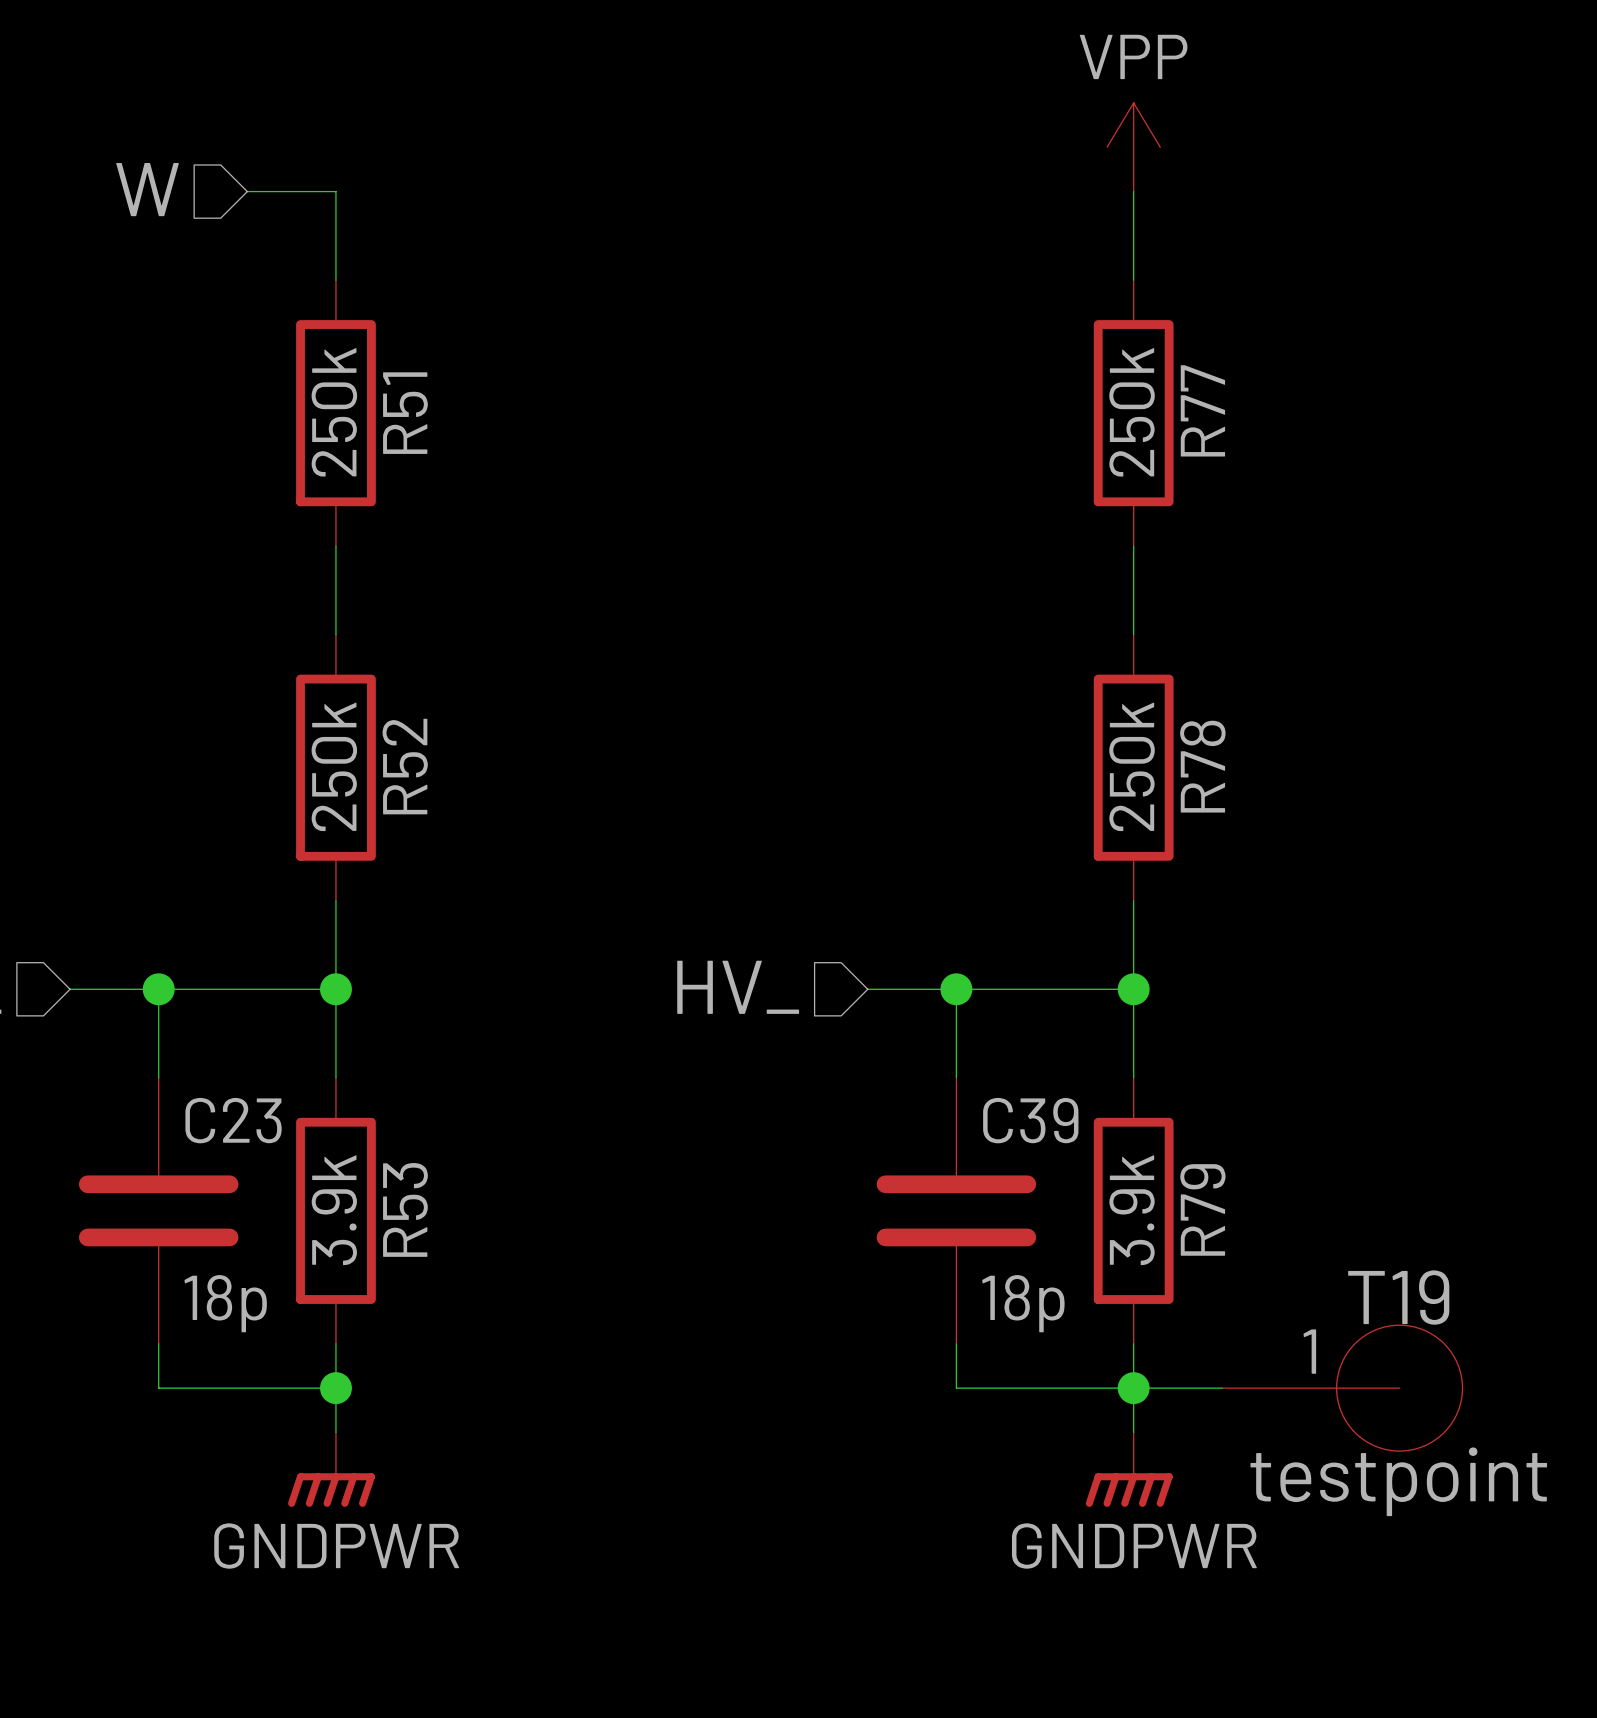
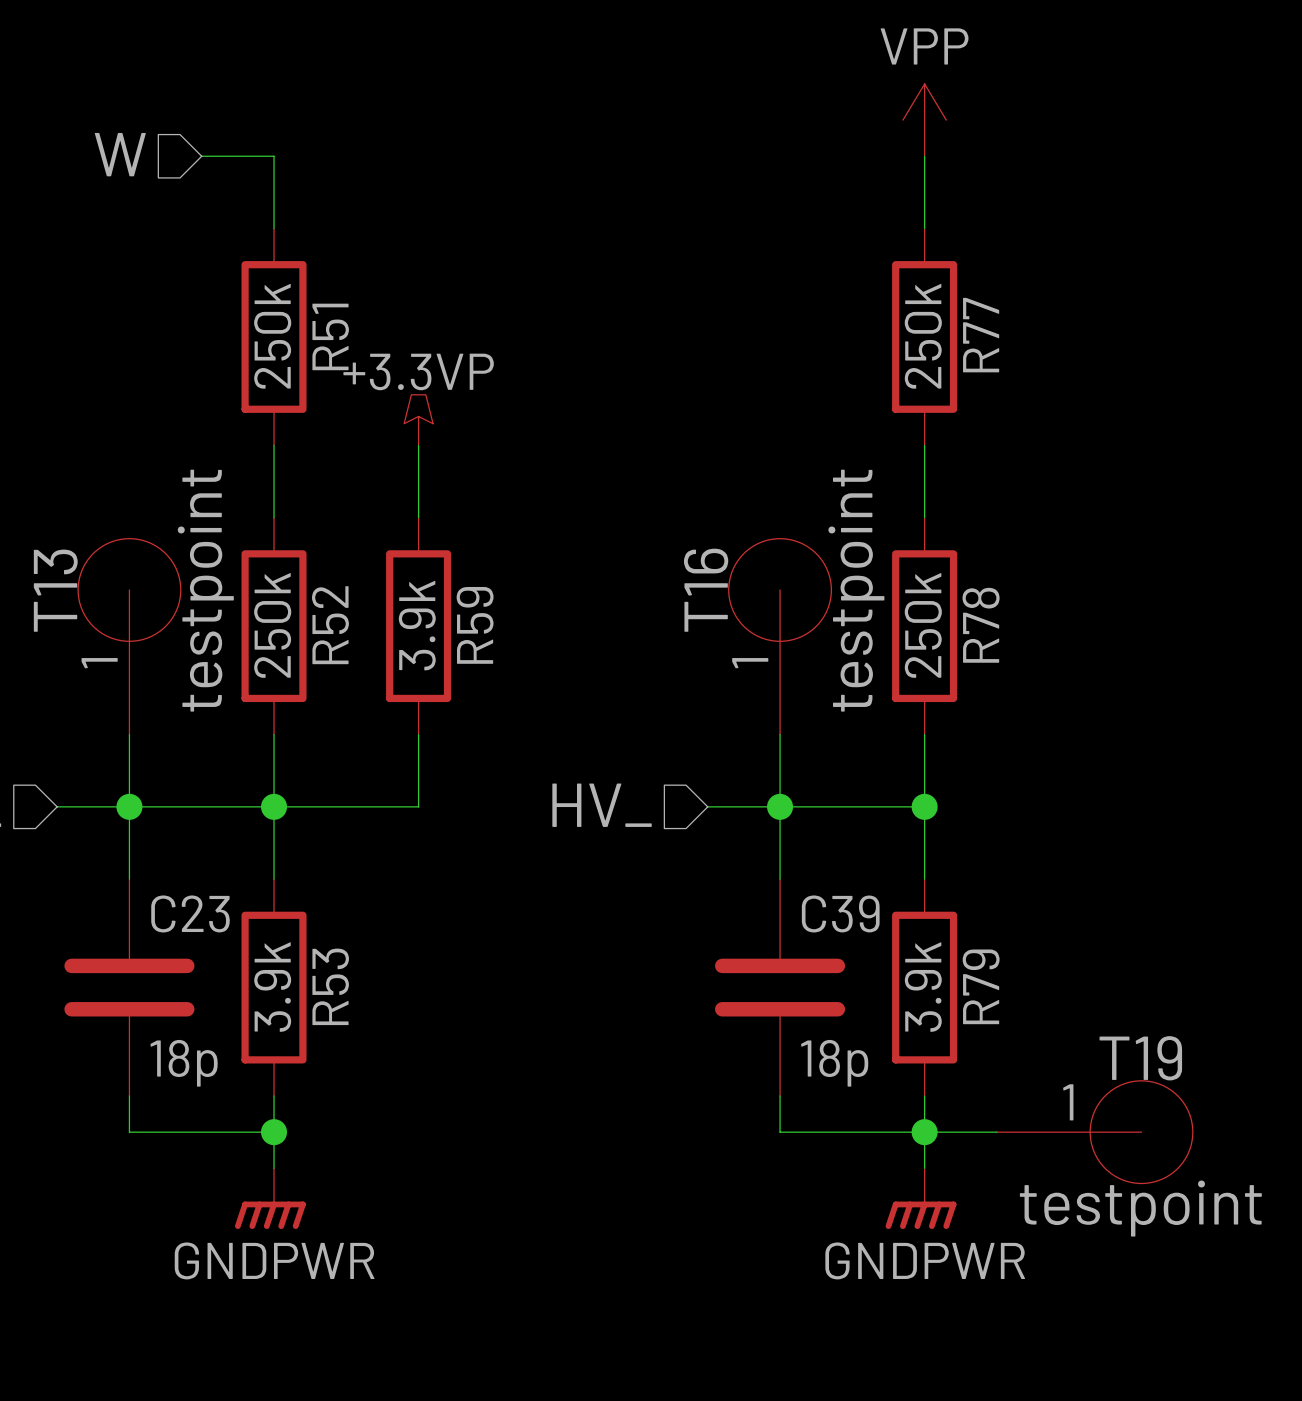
power symbol: none -> +3.3VP (418, 420)
wire: none -> (418, 445) (418, 517)
R59: none -> 3.9k (418, 626)
T13: none -> testpoint (129, 636)
T16: none -> testpoint (780, 636)
wire: none -> (129, 734) (129, 806)
wire: none -> (418, 734) (418, 806) (274, 806)
wire: none -> (780, 734) (780, 806)

